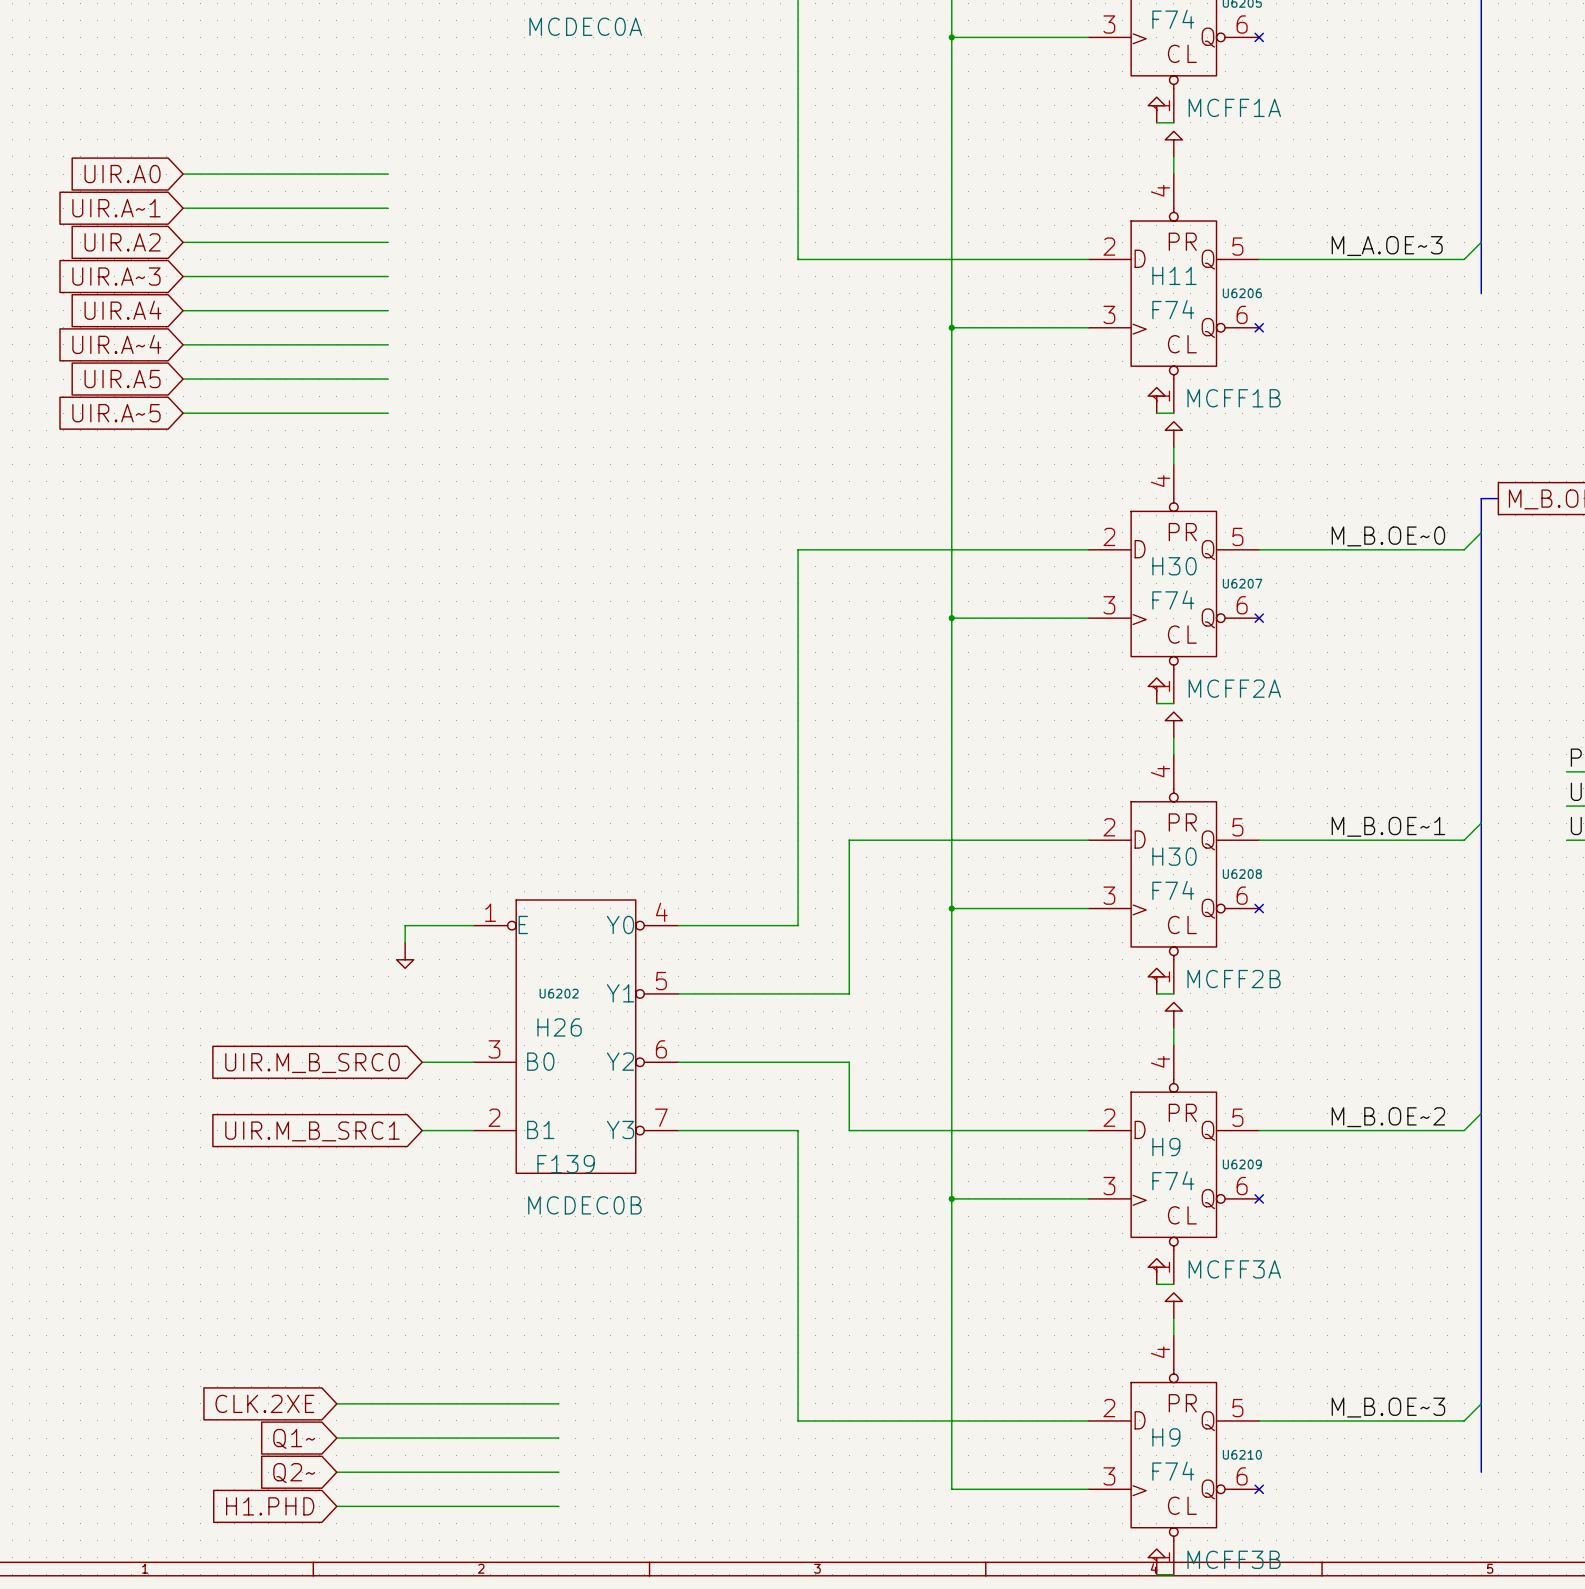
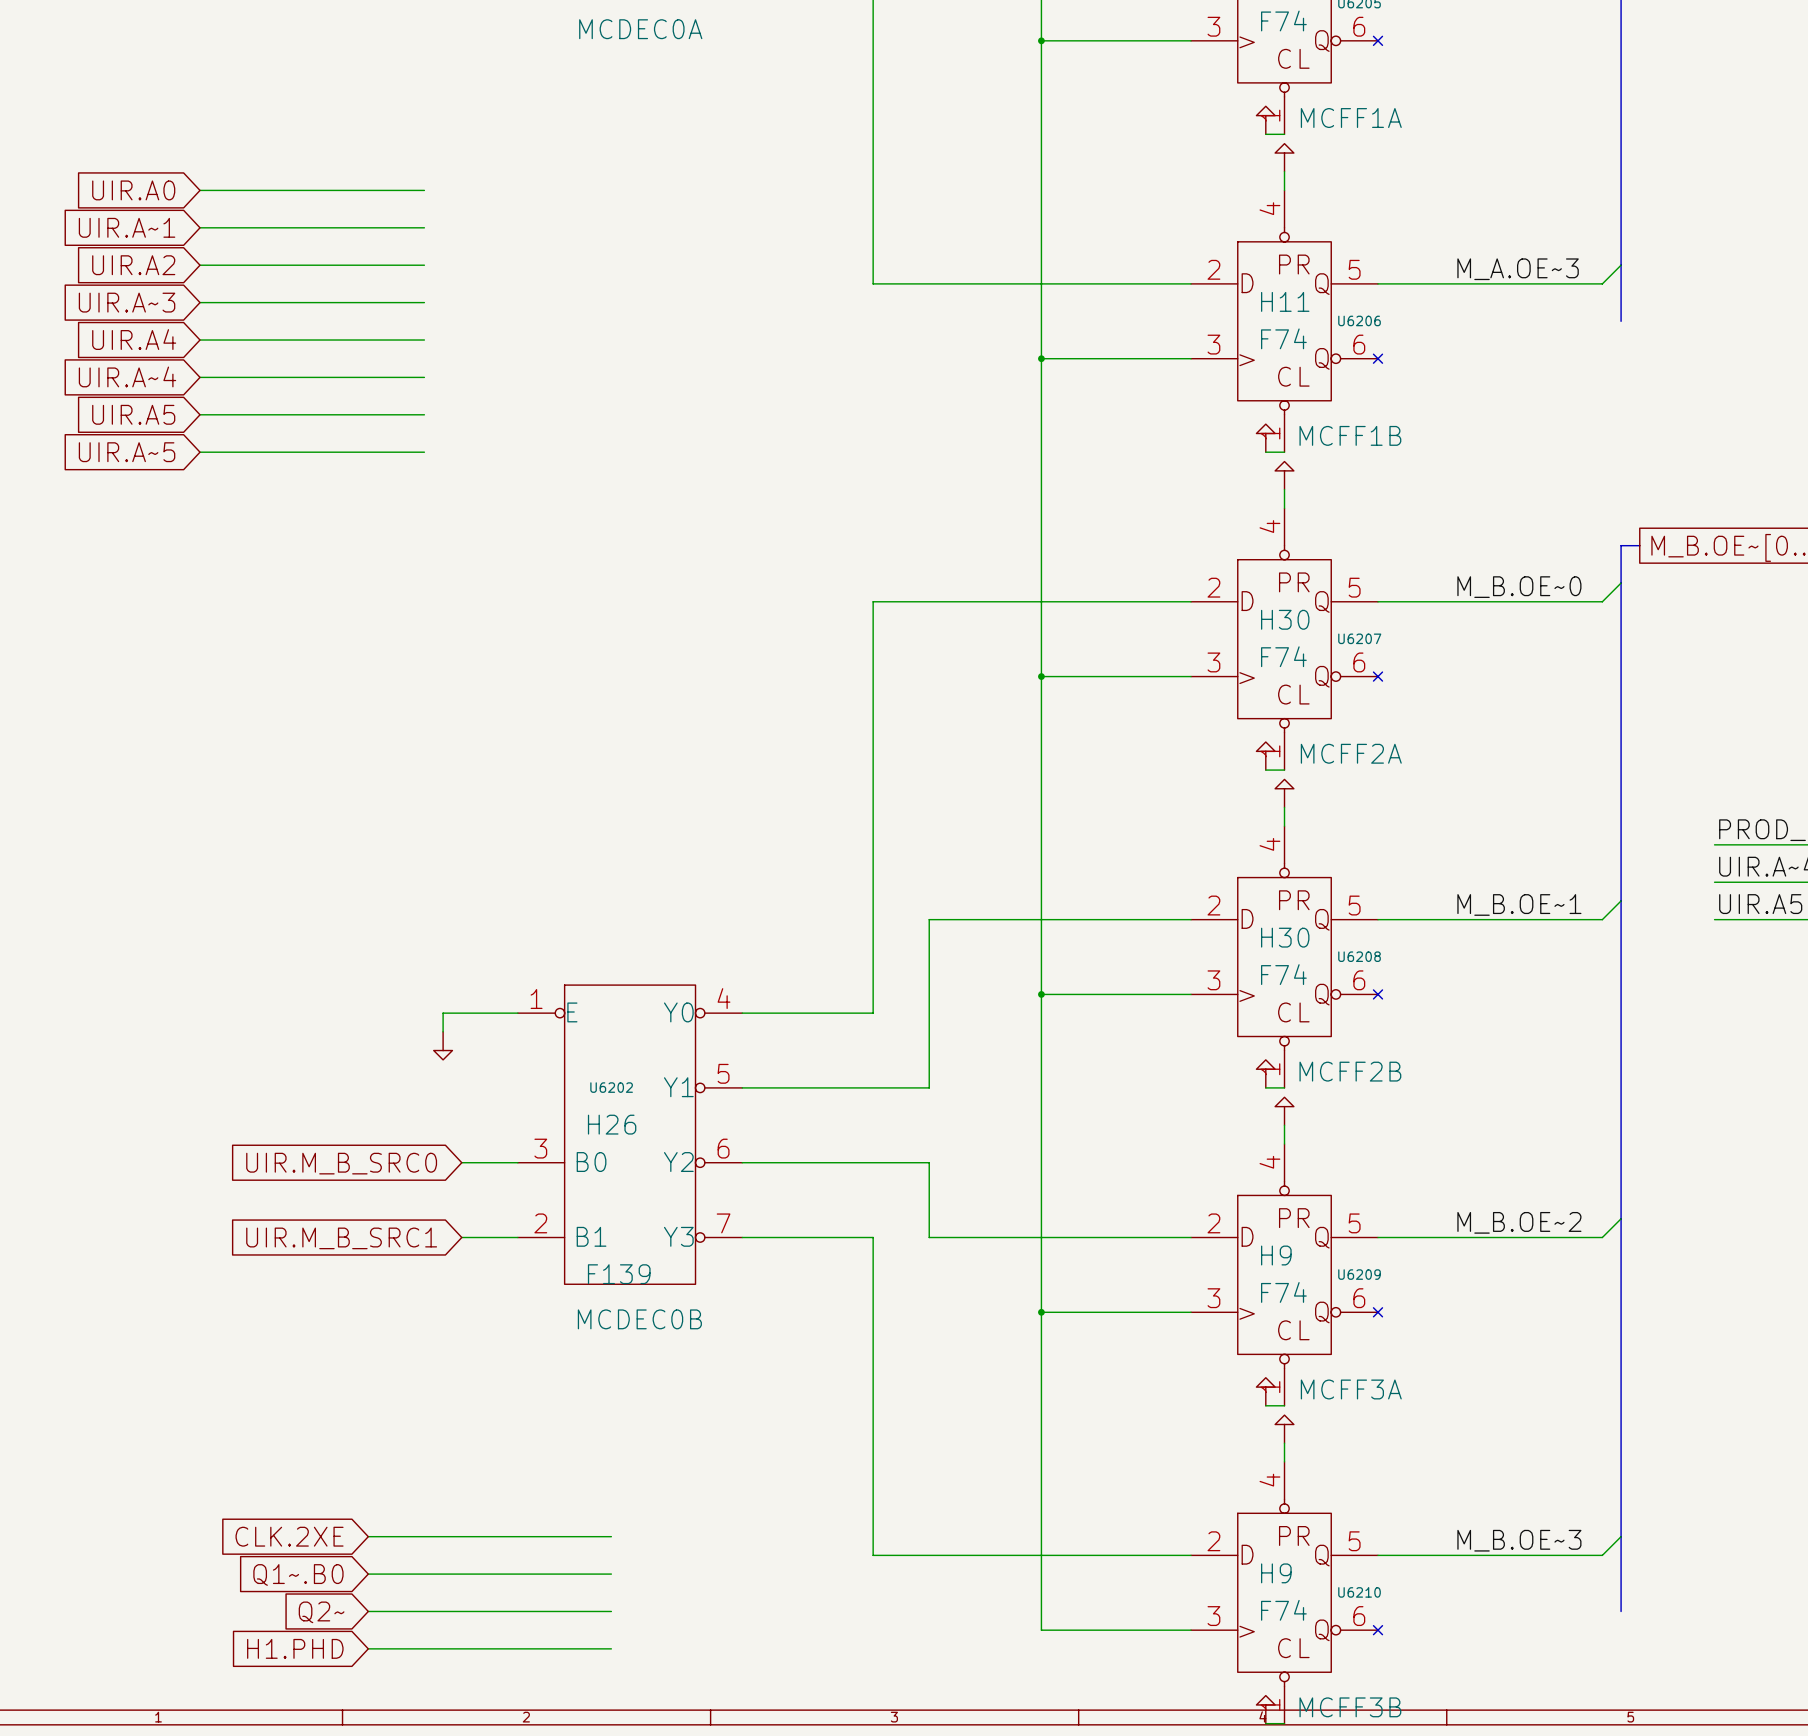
global label: Q1~ (294, 1438) -> Q1~.B0 (298, 1574)

